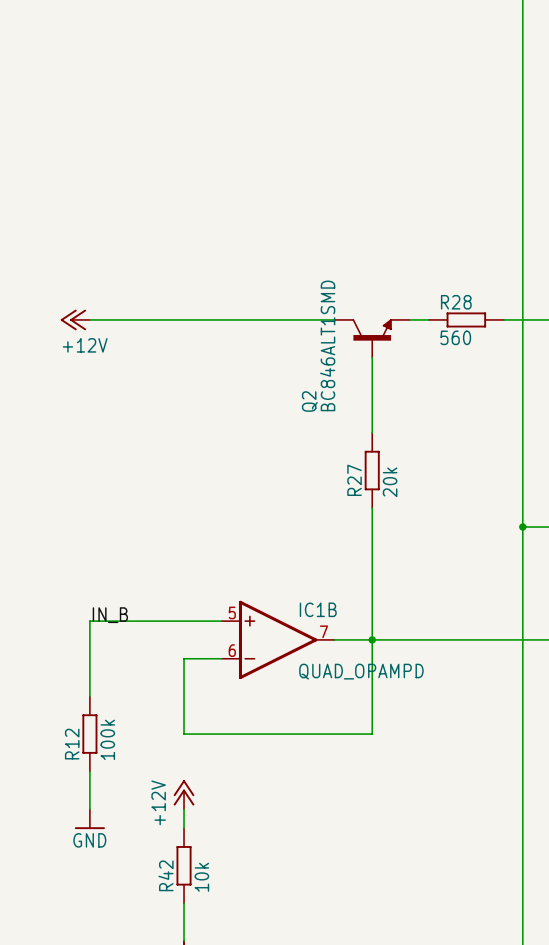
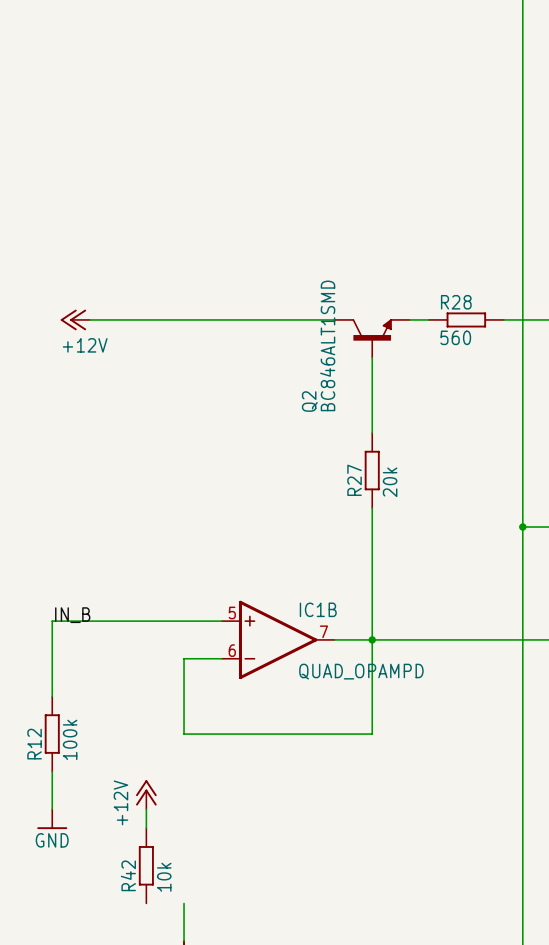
label position: IN_B (110, 615) -> IN_B (72, 615)
wire: (89, 621) (89, 696) -> (89, 621) (52, 621) (52, 696)
R12 position: (89, 734) -> (52, 734)
wire: (89, 771) (89, 809) -> (52, 771) (52, 809)
power symbol position: +12V (184, 794) -> +12V (146, 794)
wire: (184, 809) (184, 828) -> (146, 809) (146, 828)
power symbol position: GND (89, 819) -> GND (52, 819)
R42 position: (184, 865) -> (146, 865)

